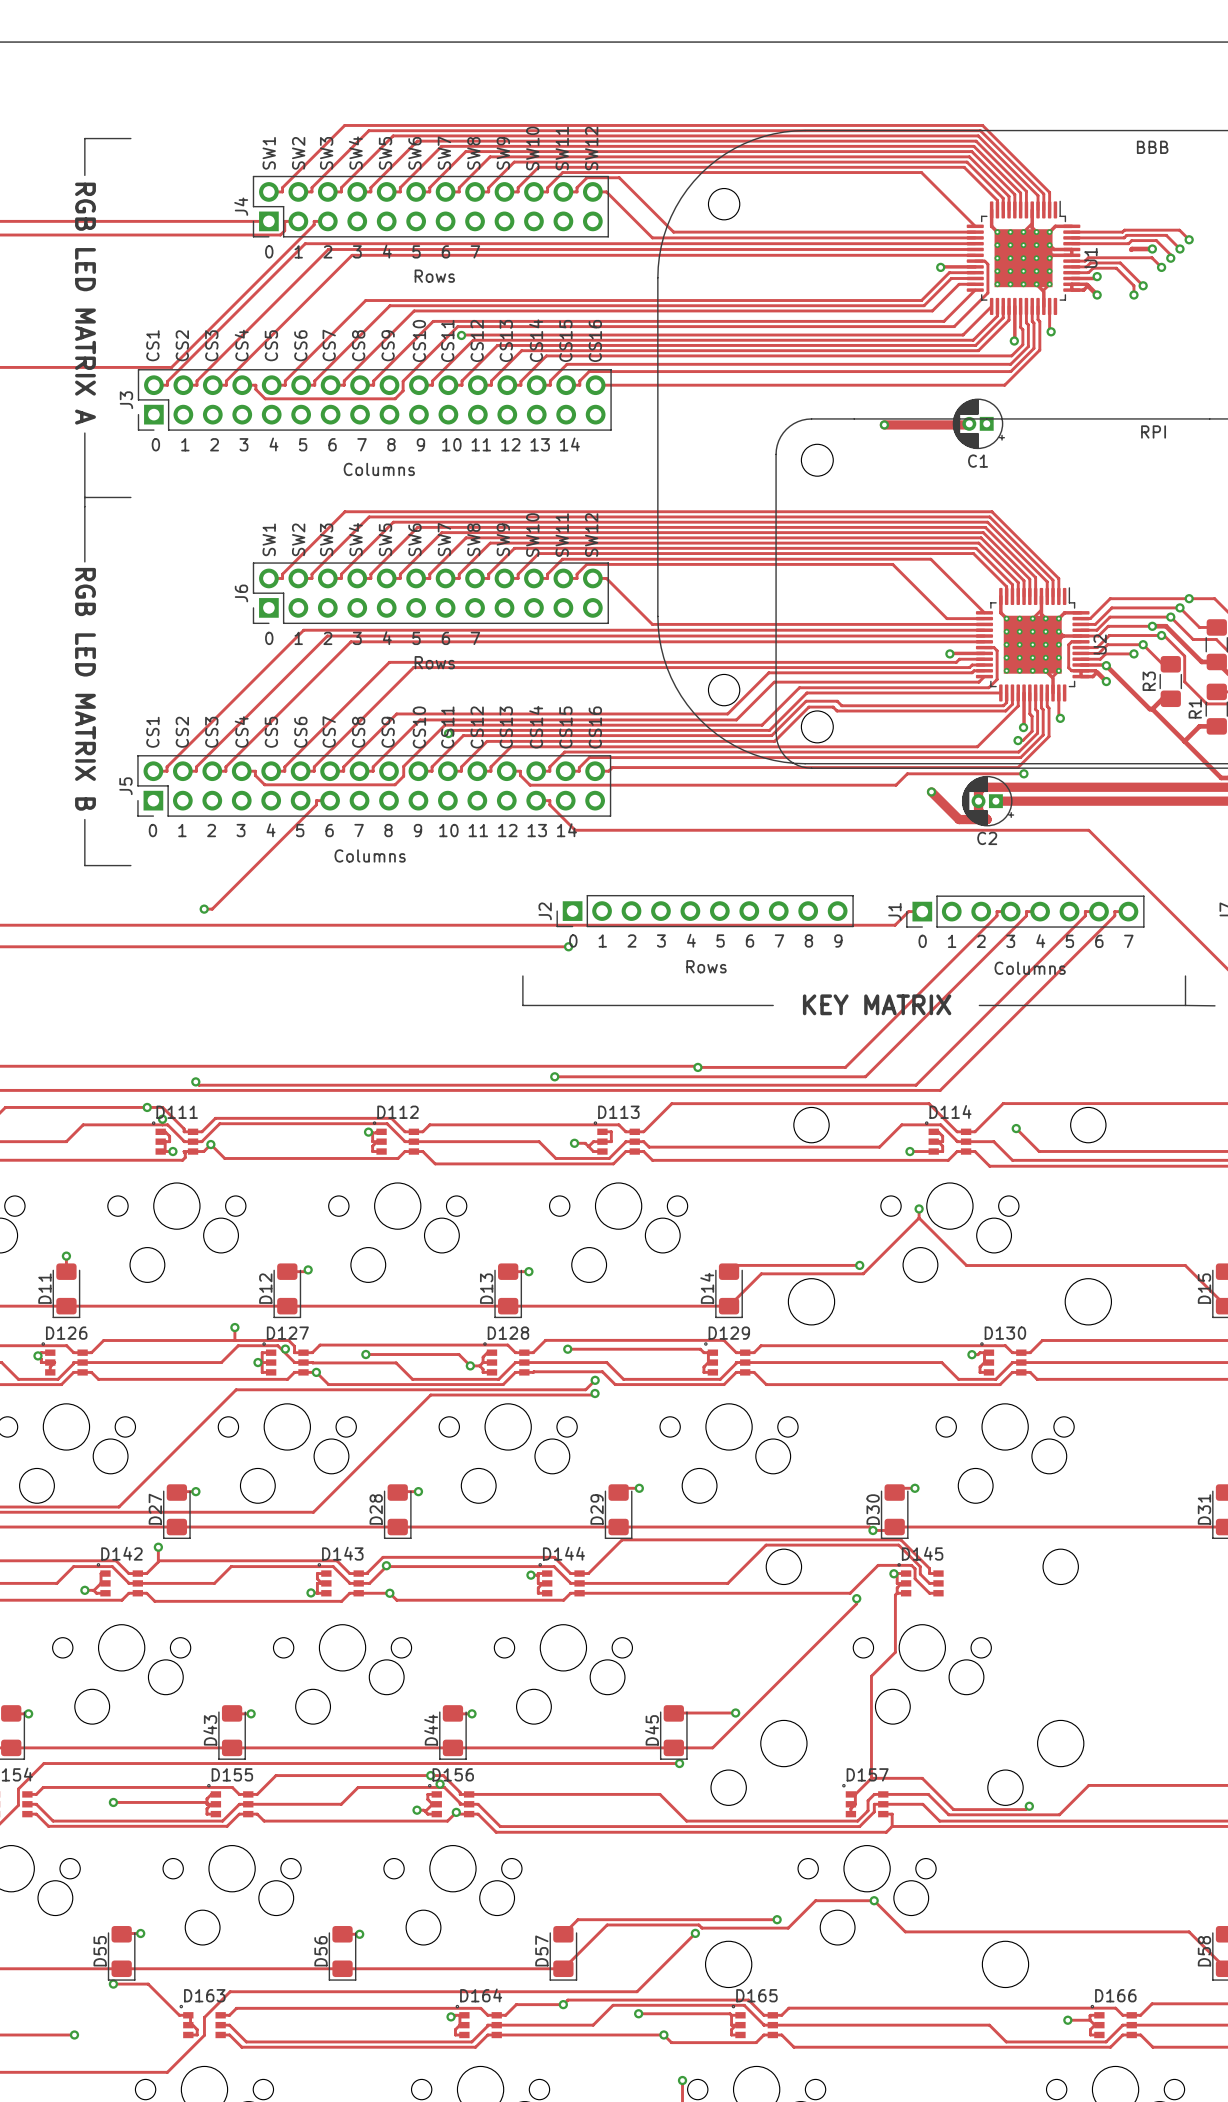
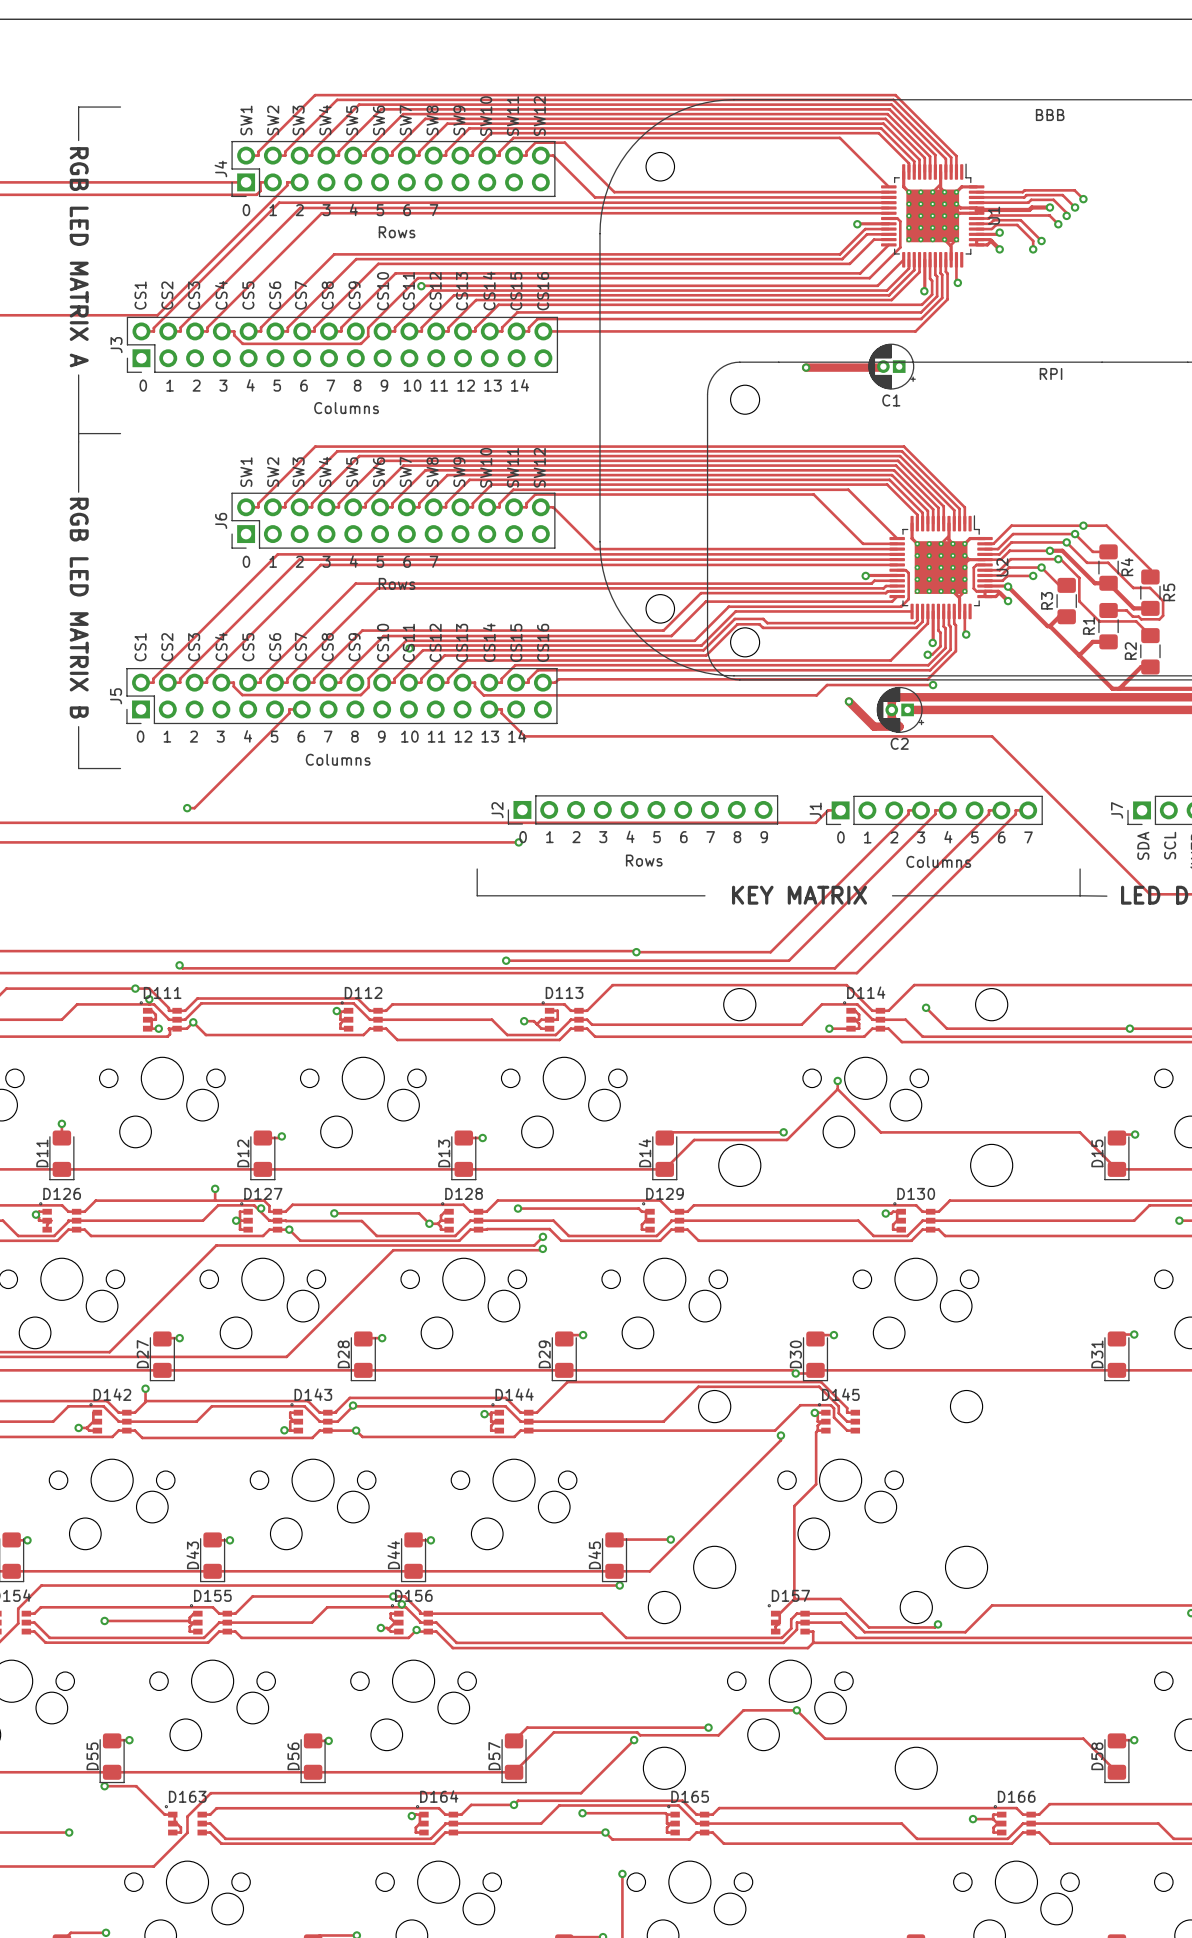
track: (1132, 248) (1131, 249) -> (1031, 207) (1029, 209) (976, 210)

